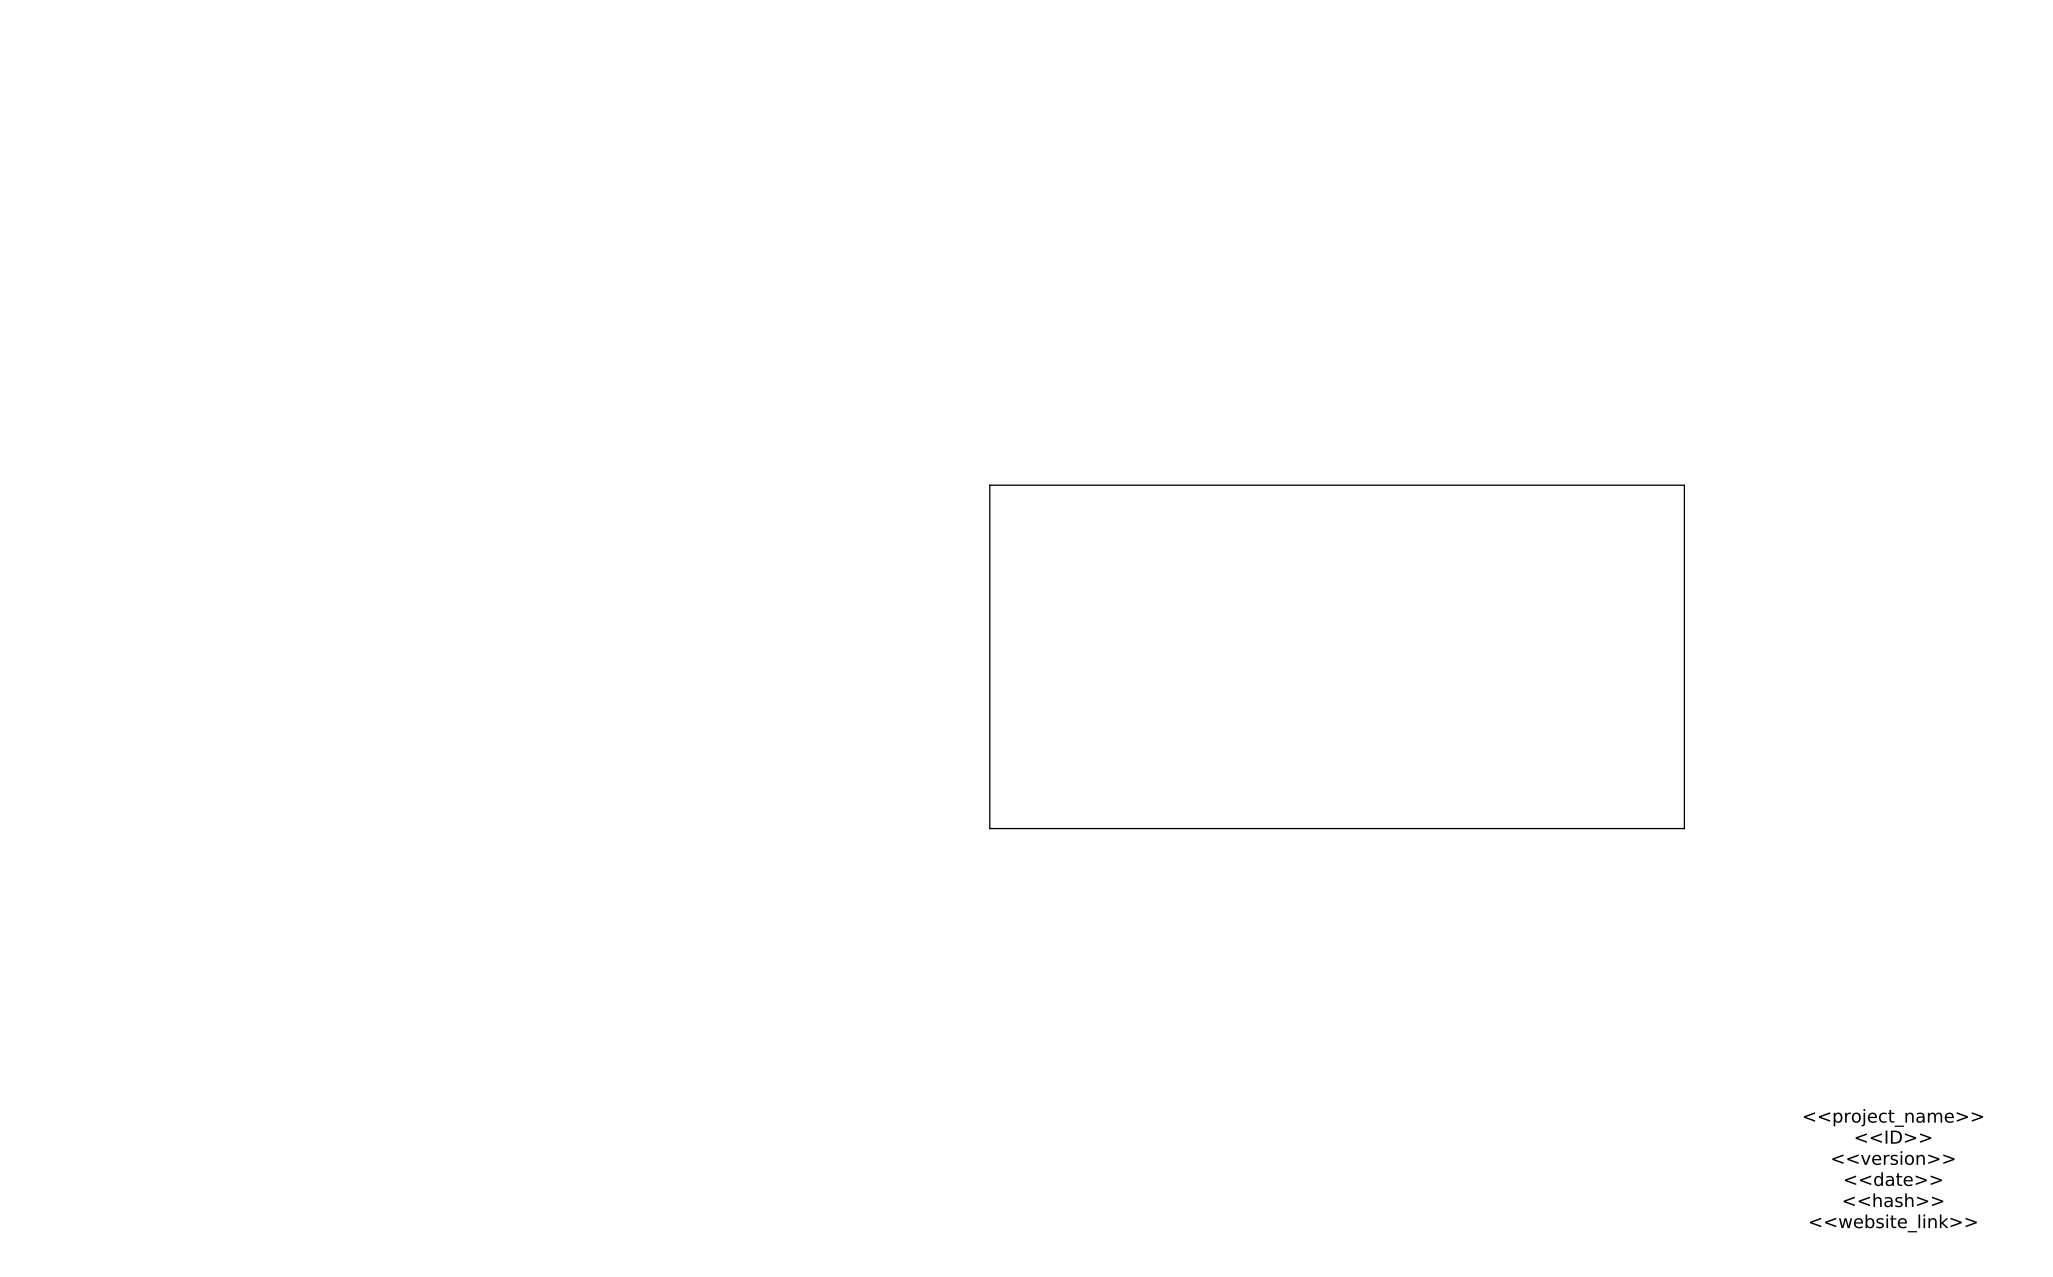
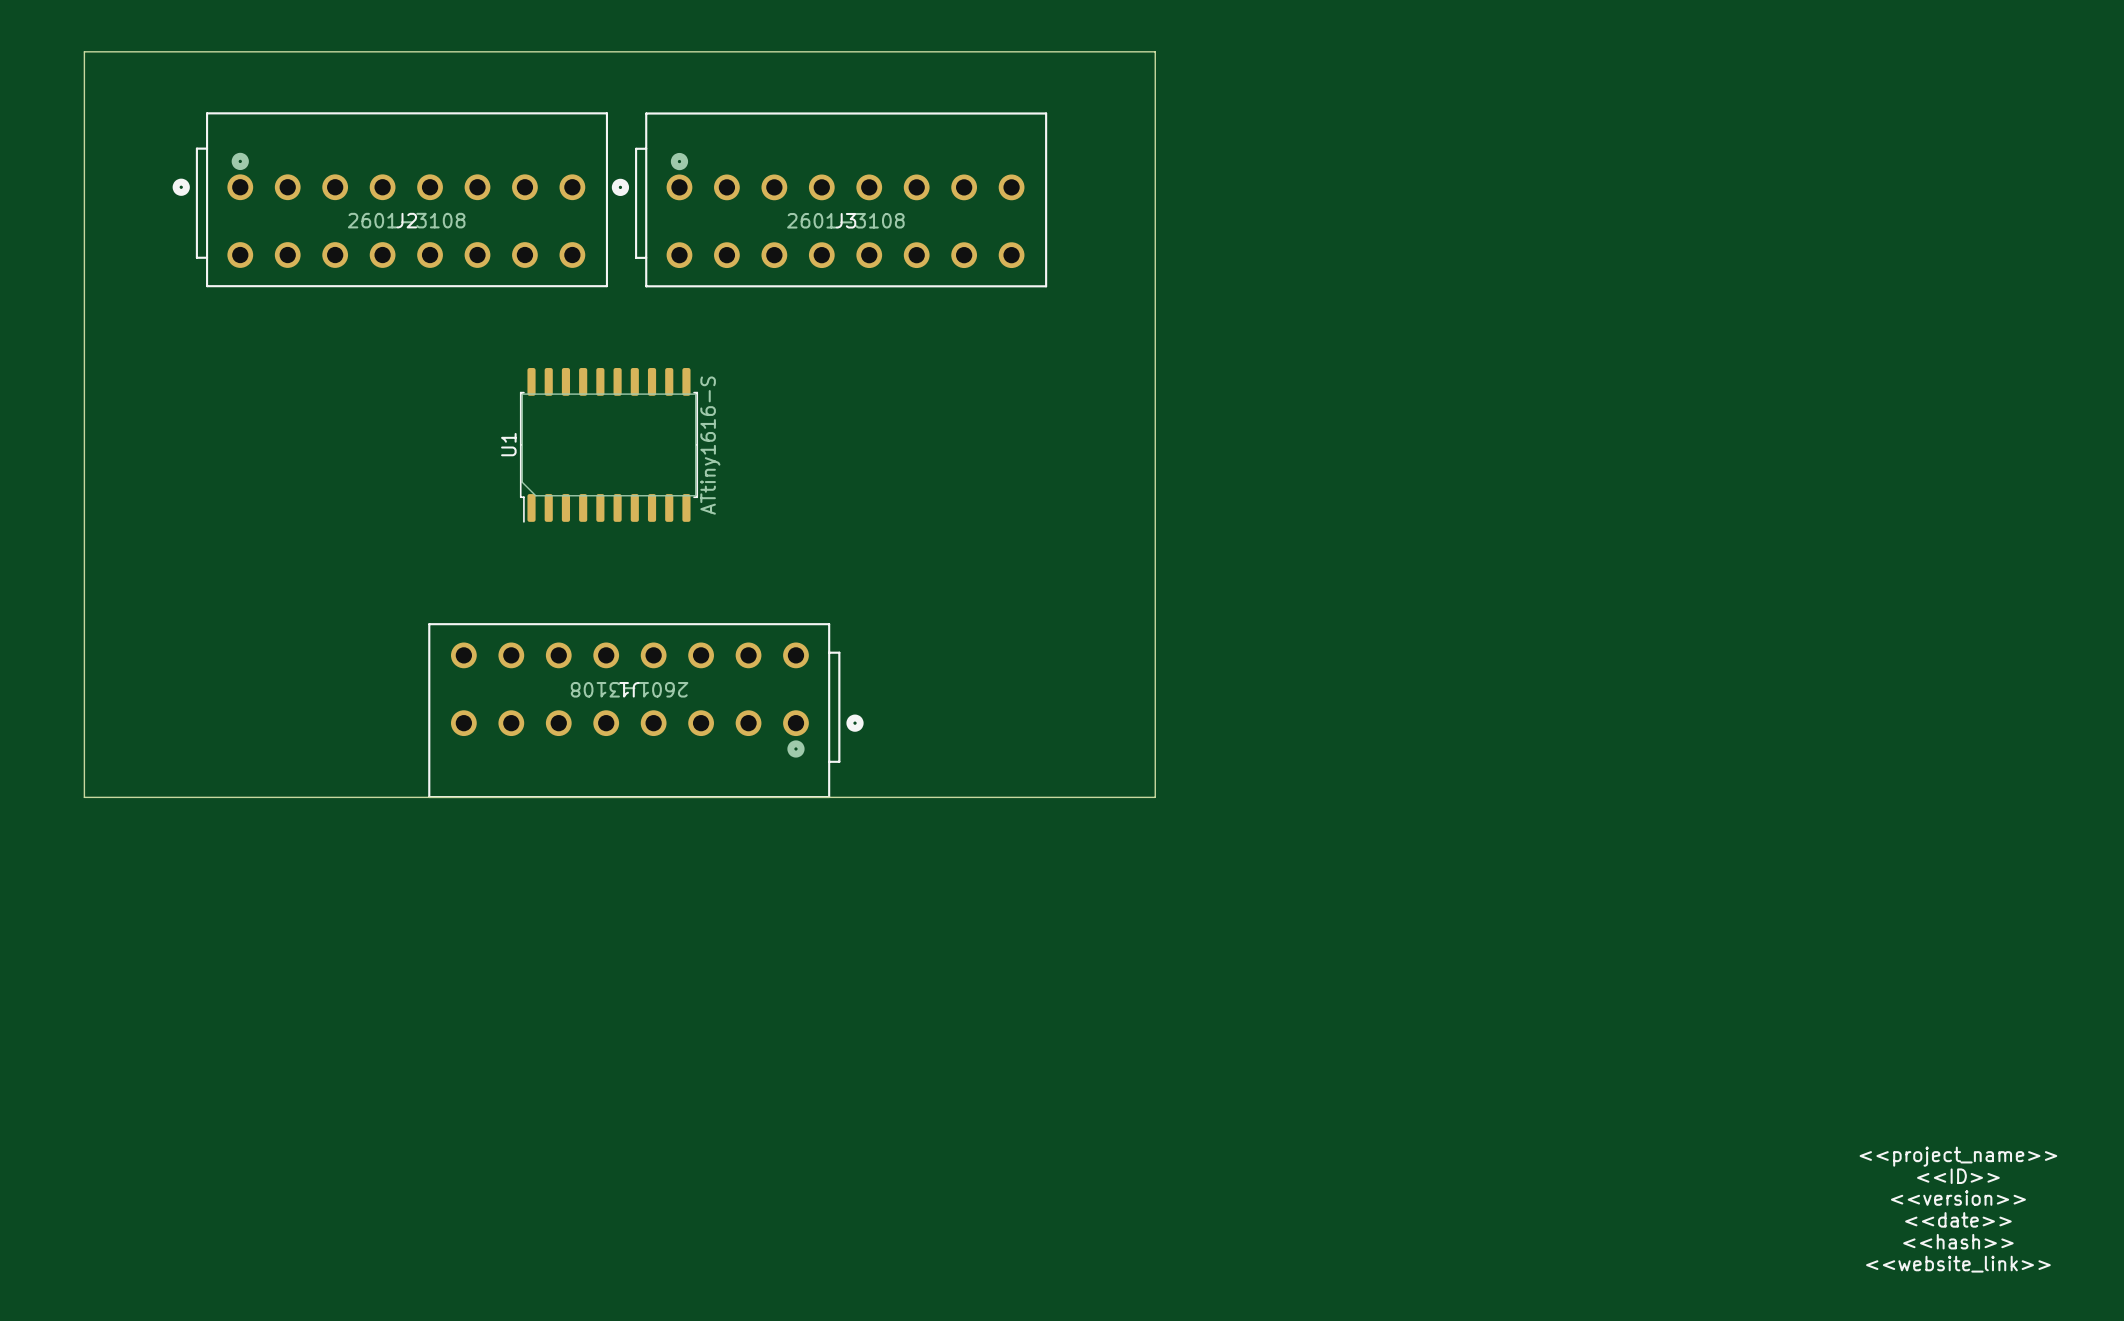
board edge: none -> (84, 51) (1155, 51) (1155, 797) (84, 797) (84, 51)
J2: none -> 2601-3108 (390, 199)
J3: none -> 2601-3108 (829, 199)
U1: none -> ATtiny1616-S (608, 445)
board edge: (989, 485) (1684, 485) (1684, 828) (989, 828) (989, 485) -> none
J1: none -> 2601-3108 (645, 710)

